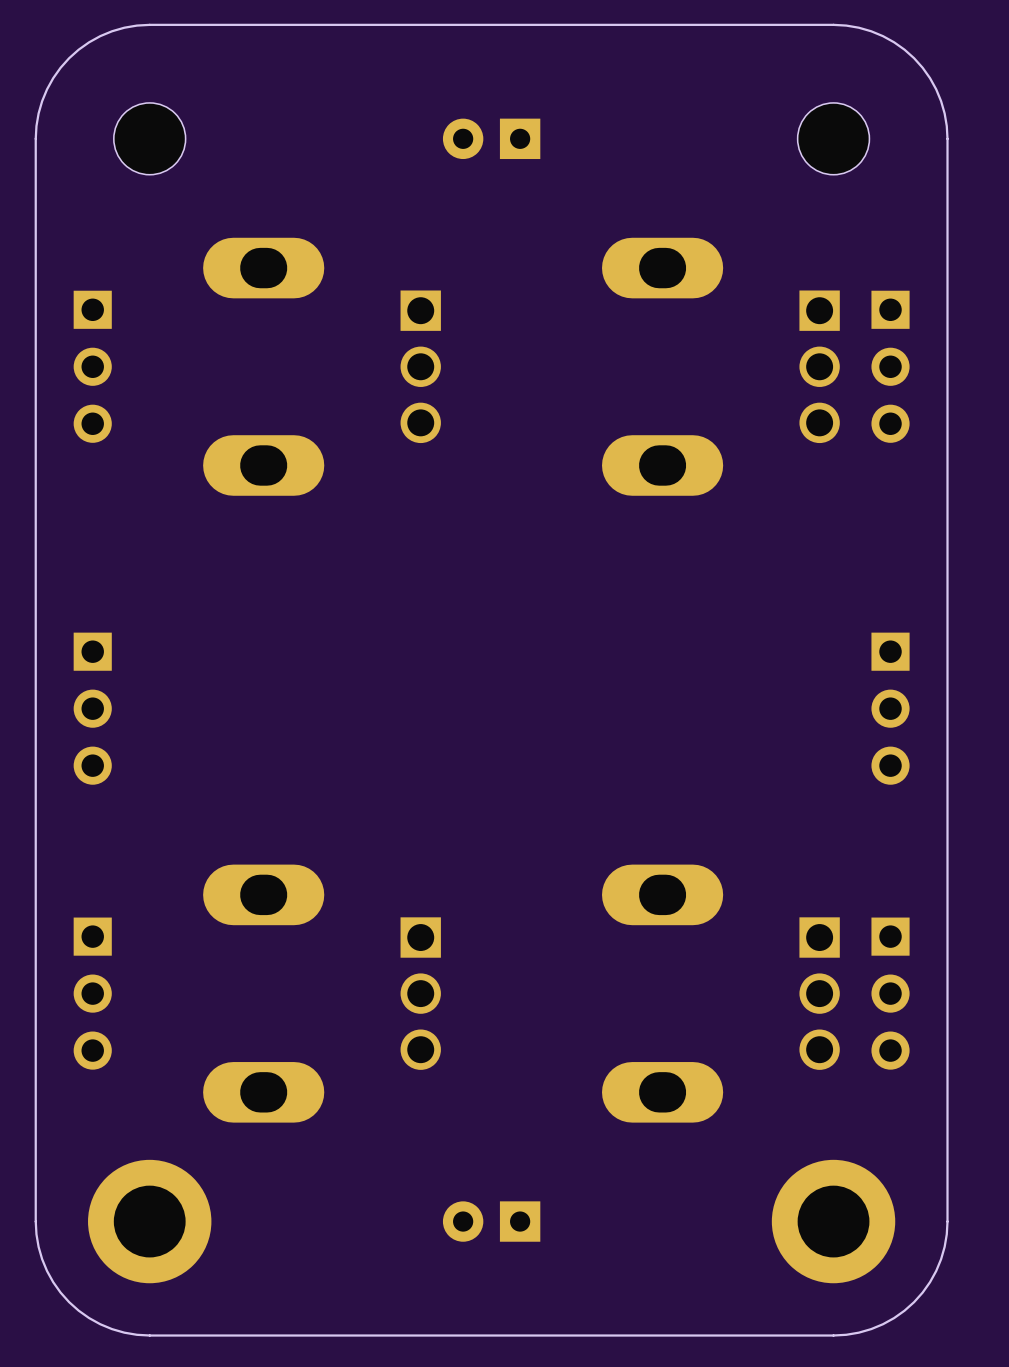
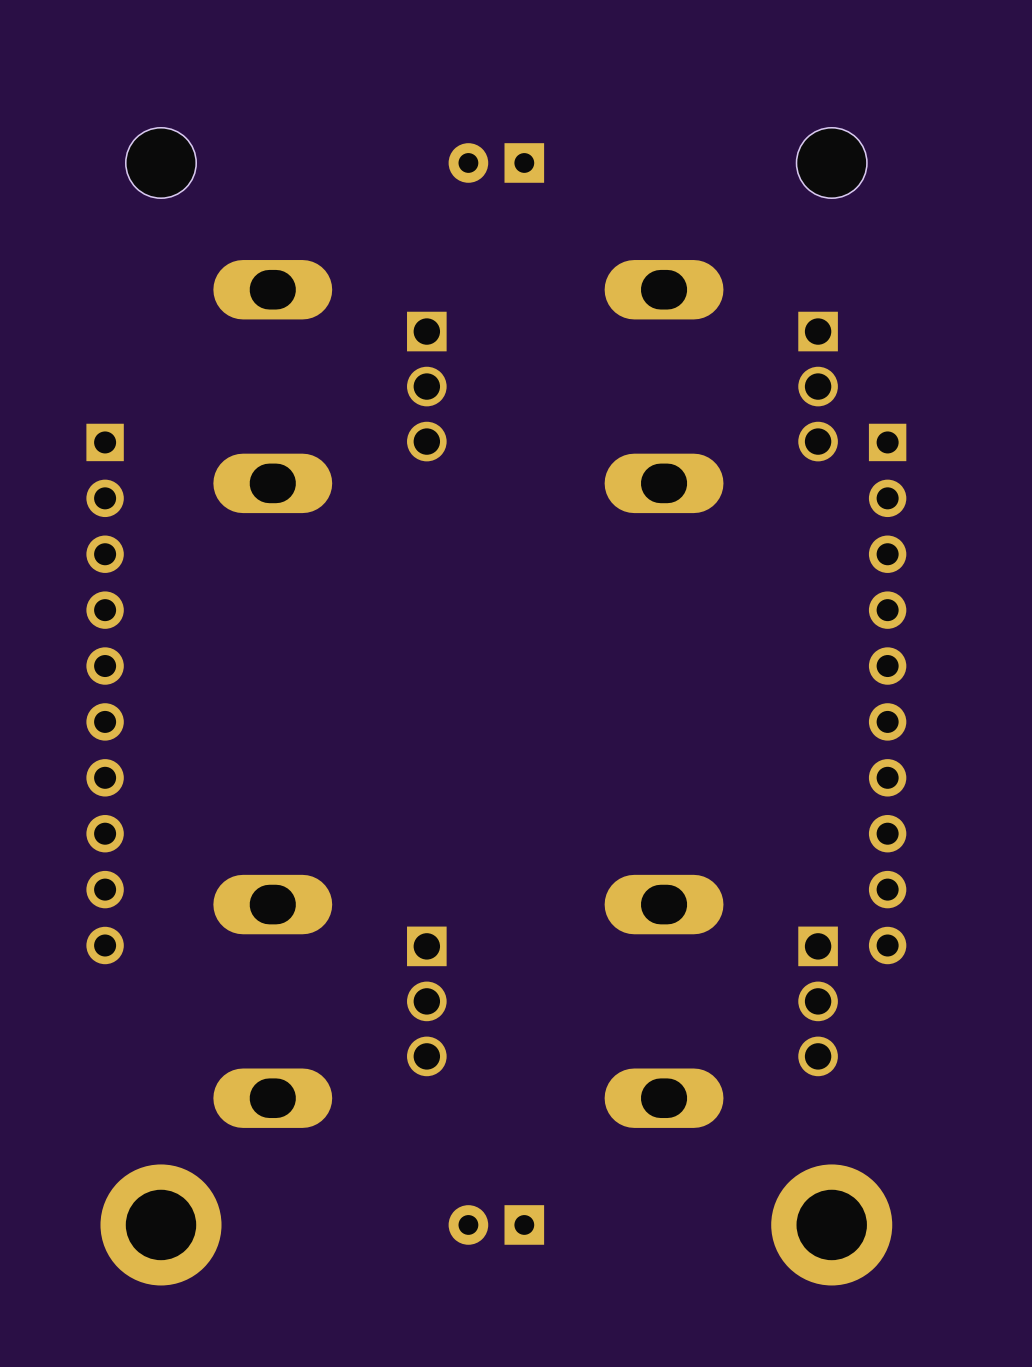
board edge: (833, 24) (136, 25) (112, 31) (89, 42) (69, 58) (53, 78) (38, 113) (35, 138) (35, 1221) (38, 1246) (47, 1270) (69, 1302) (89, 1318) (124, 1332) (149, 1335) (833, 1335) (858, 1332) (894, 1318) (914, 1302) (930, 1282) (941, 1259) (947, 1221) (946, 126) (941, 101) (930, 78) (904, 49) (871, 31) (833, 24) -> none
part: (92, 366) -> none
part: (890, 366) -> none
part: none -> (105, 693)
part: none -> (887, 693)
part: (92, 708) -> none
part: (890, 708) -> none
part: (92, 993) -> none
part: (890, 993) -> none

